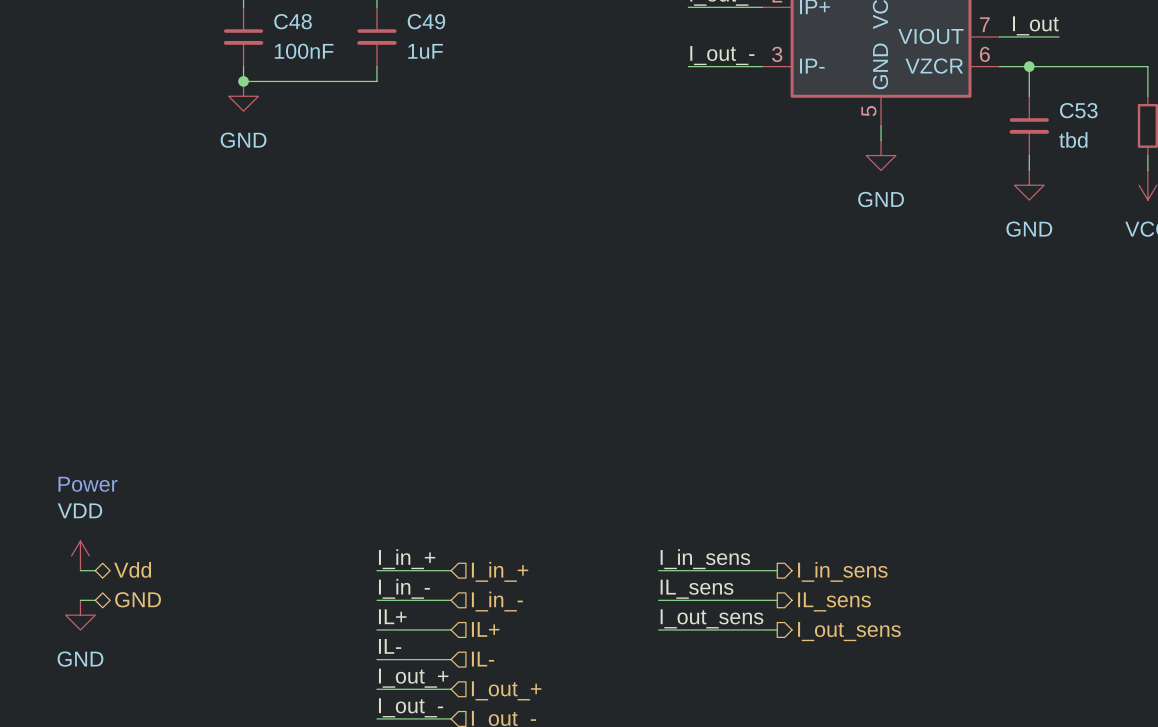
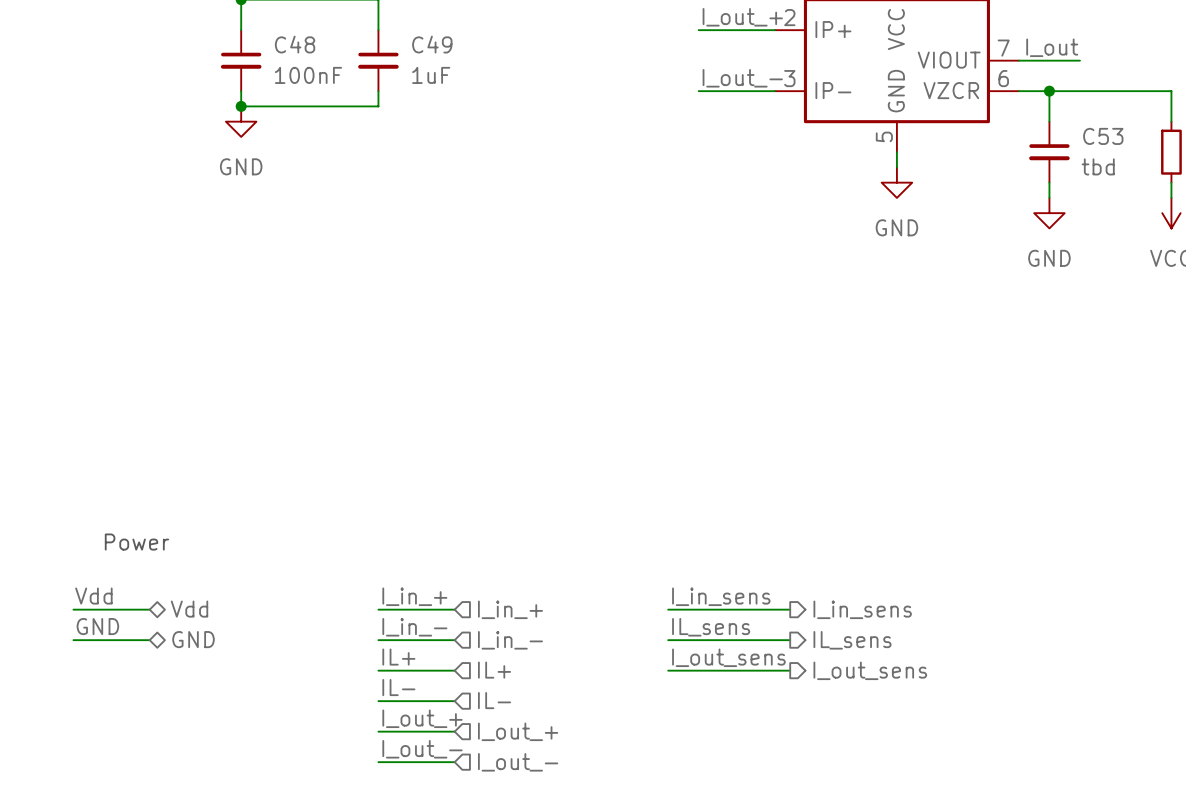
text position: Power (87, 484) -> Power (136, 542)
power symbol: VDD (80, 555) -> none
label: none -> Vdd (93, 596)
hierarchical label position: Vdd (132, 569) -> Vdd (189, 609)
wire: none -> (88, 609) (149, 609)
label: none -> GND (97, 626)
hierarchical label position: GND (138, 599) -> GND (193, 639)
wire: none -> (88, 640) (149, 640)
power symbol: GND (80, 615) -> none

